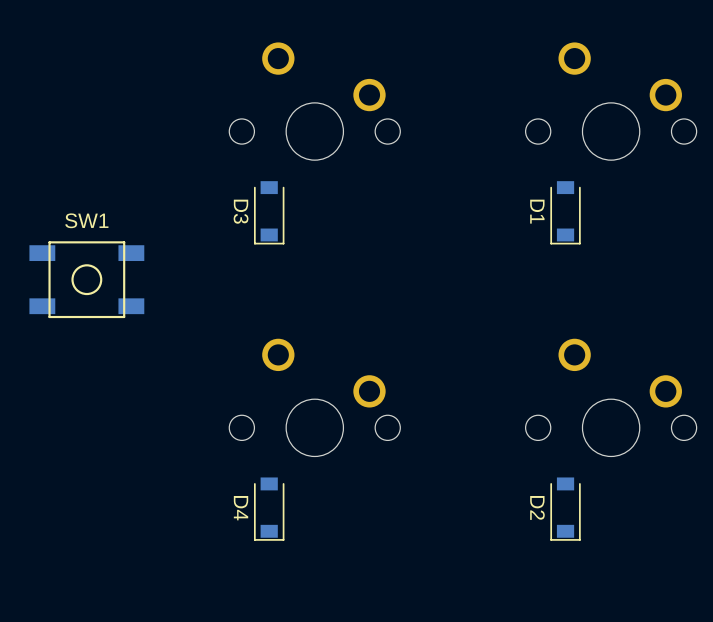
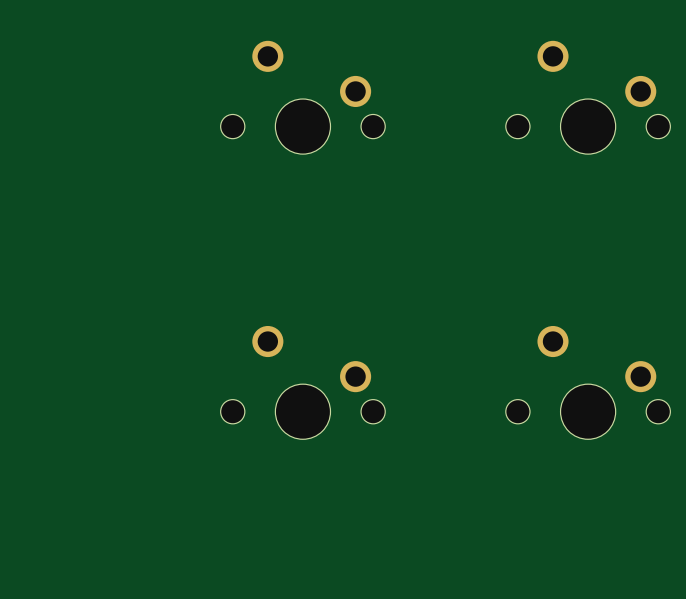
D3: (269, 212) -> none
D1: (565, 212) -> none
SW1: (86, 279) -> none
D4: (269, 509) -> none
D2: (565, 509) -> none

